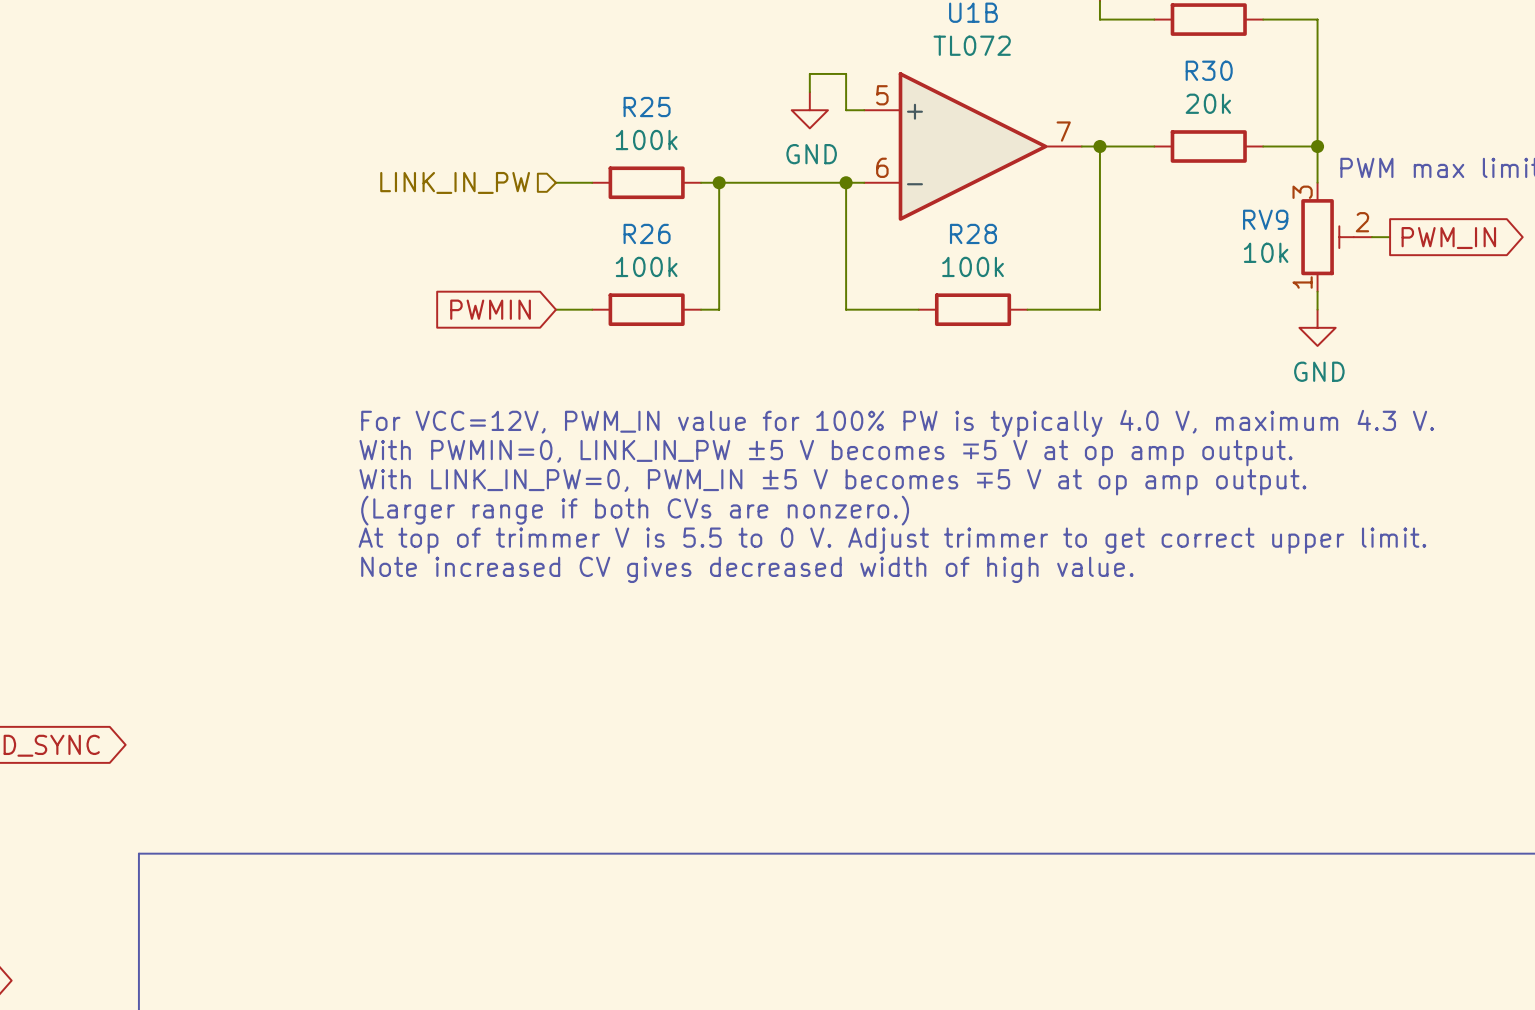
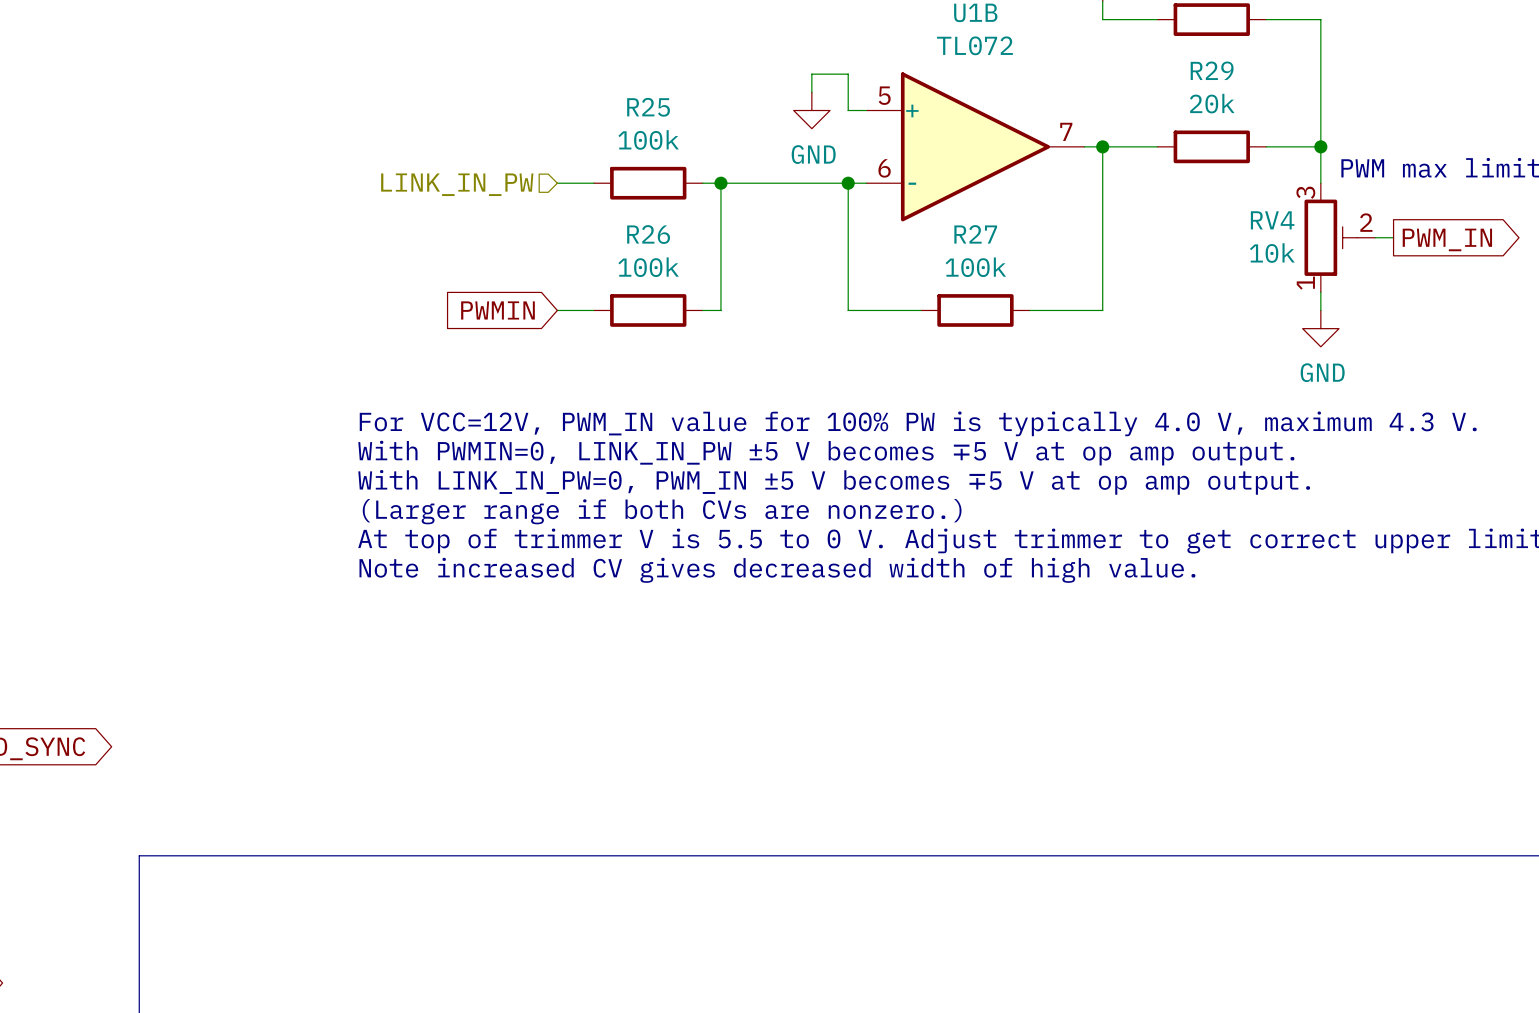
R30 name: R30 (1209, 70) -> R29 (1212, 70)
RV9 name: RV9 (1265, 219) -> RV4 (1272, 220)
R28 name: R28 (973, 233) -> R27 (975, 234)

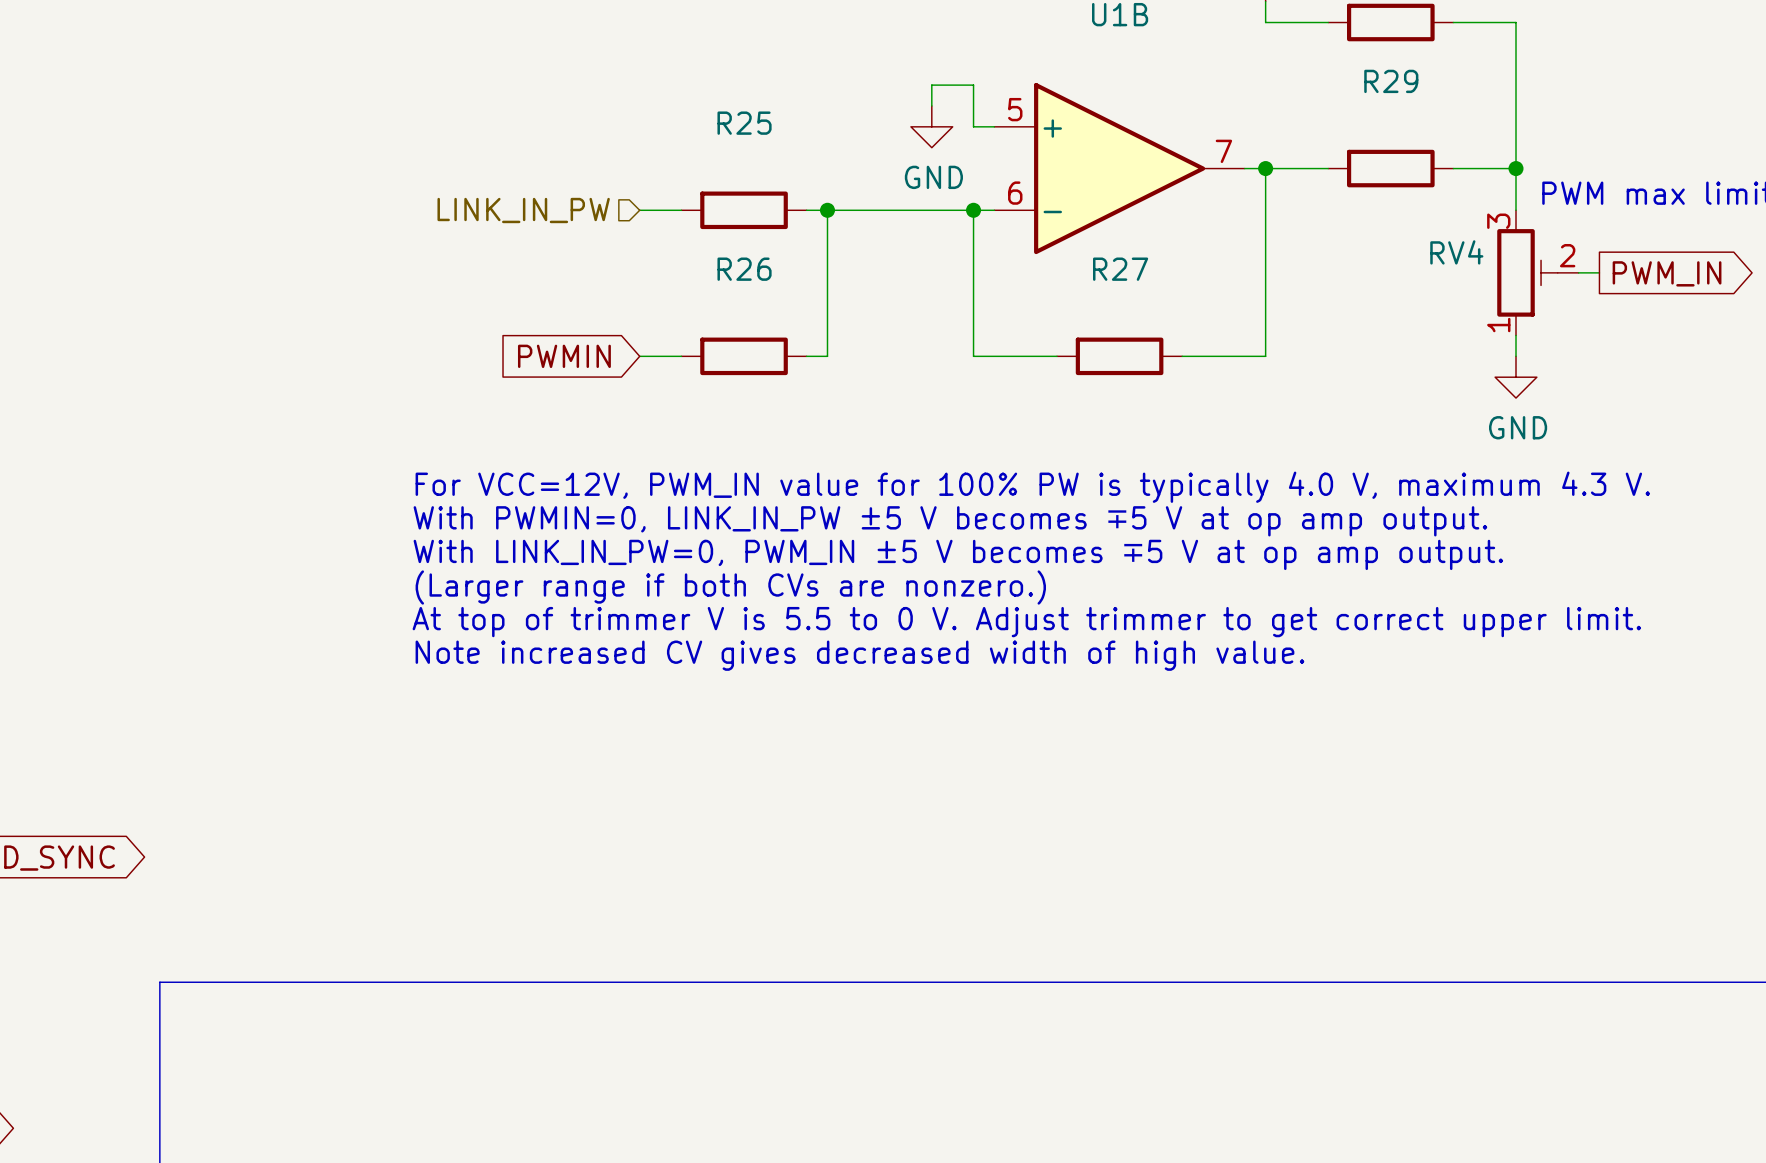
U1B value: TL072 (974, 45) -> none
R29 value: 20k (1212, 103) -> none
R25 value: 100k (648, 139) -> none
RV4 value: 10k (1272, 253) -> none
R26 value: 100k (648, 267) -> none
R27 value: 100k (975, 267) -> none

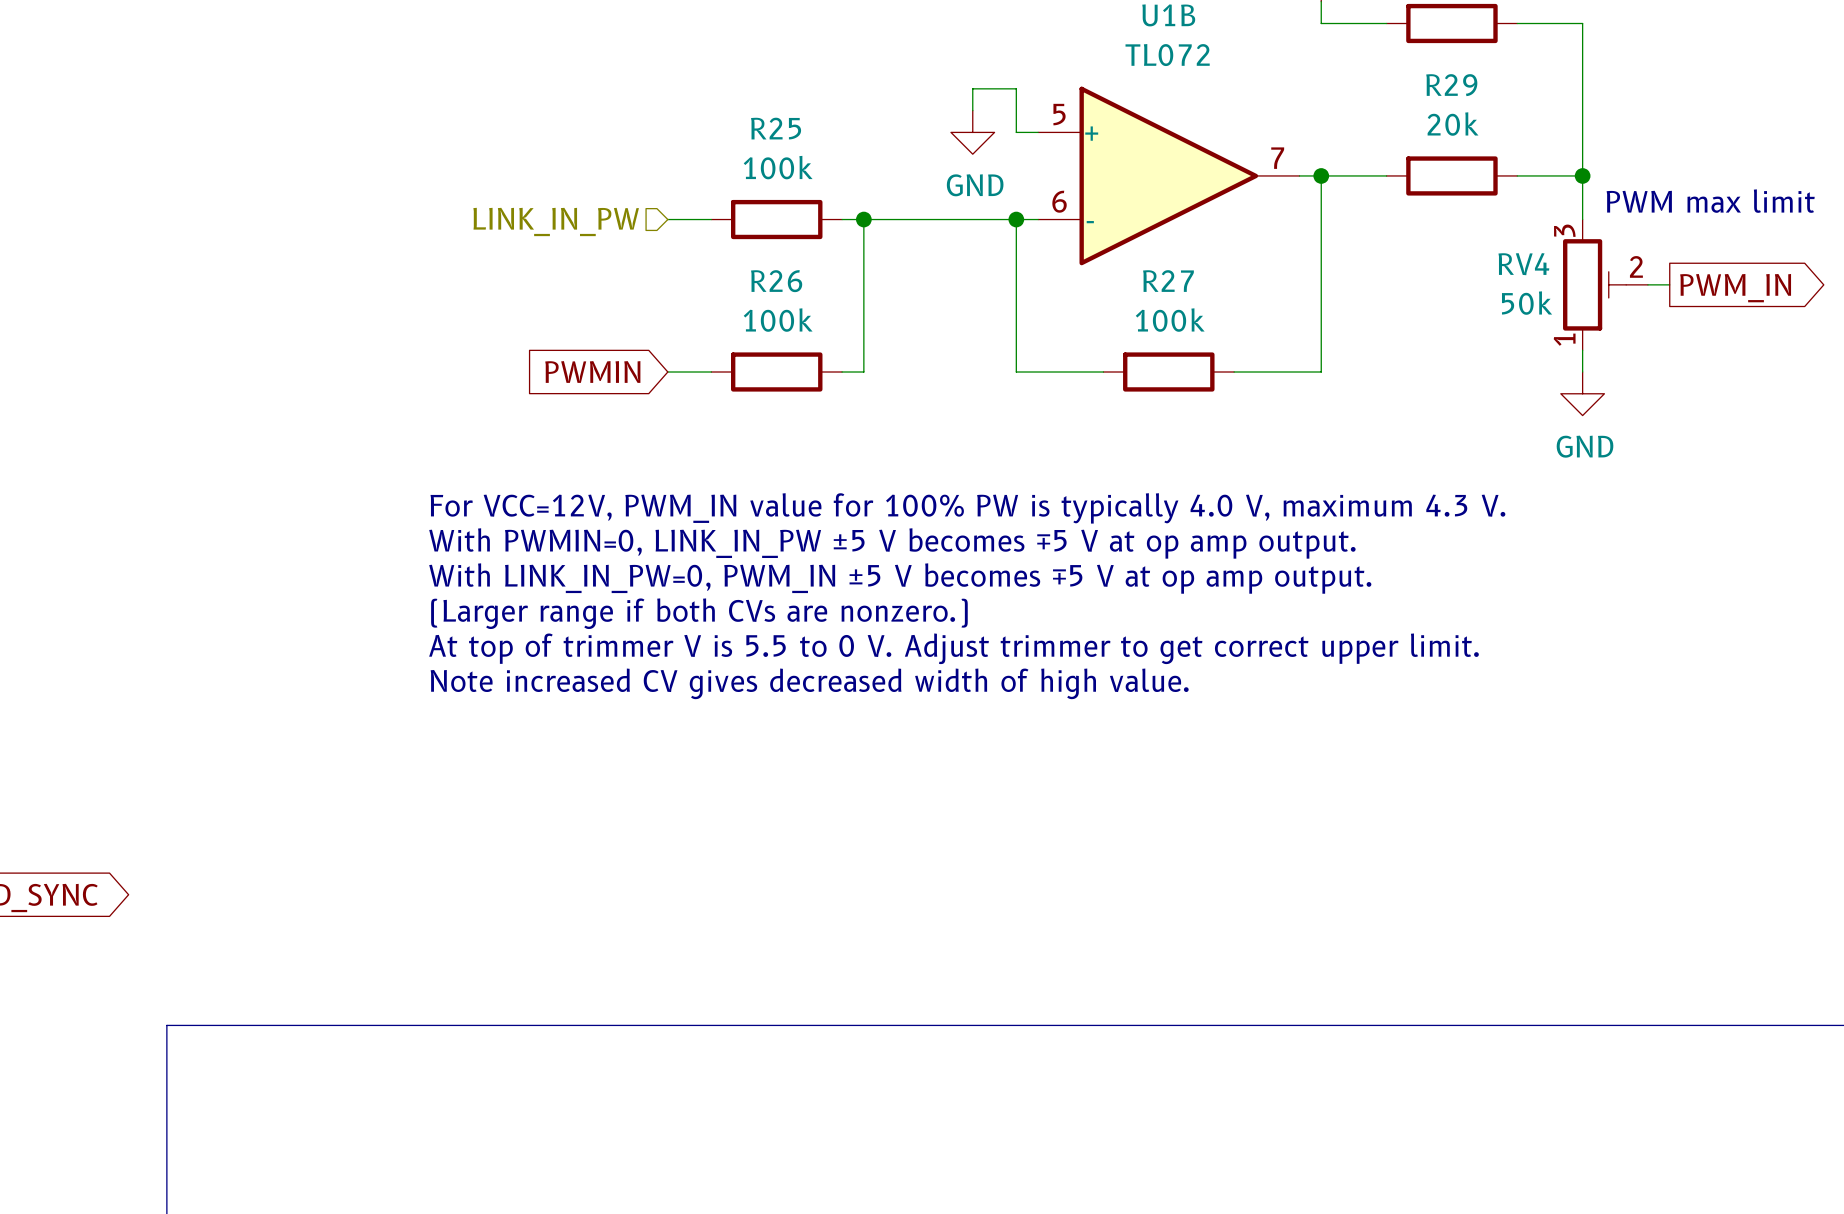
U1B value: none -> TL072 (1167, 55)
R29 value: none -> 20k (1453, 124)
R25 value: none -> 100k (778, 167)
RV4 value: none -> 50k (1527, 303)
R26 value: none -> 100k (778, 320)
R27 value: none -> 100k (1170, 320)

